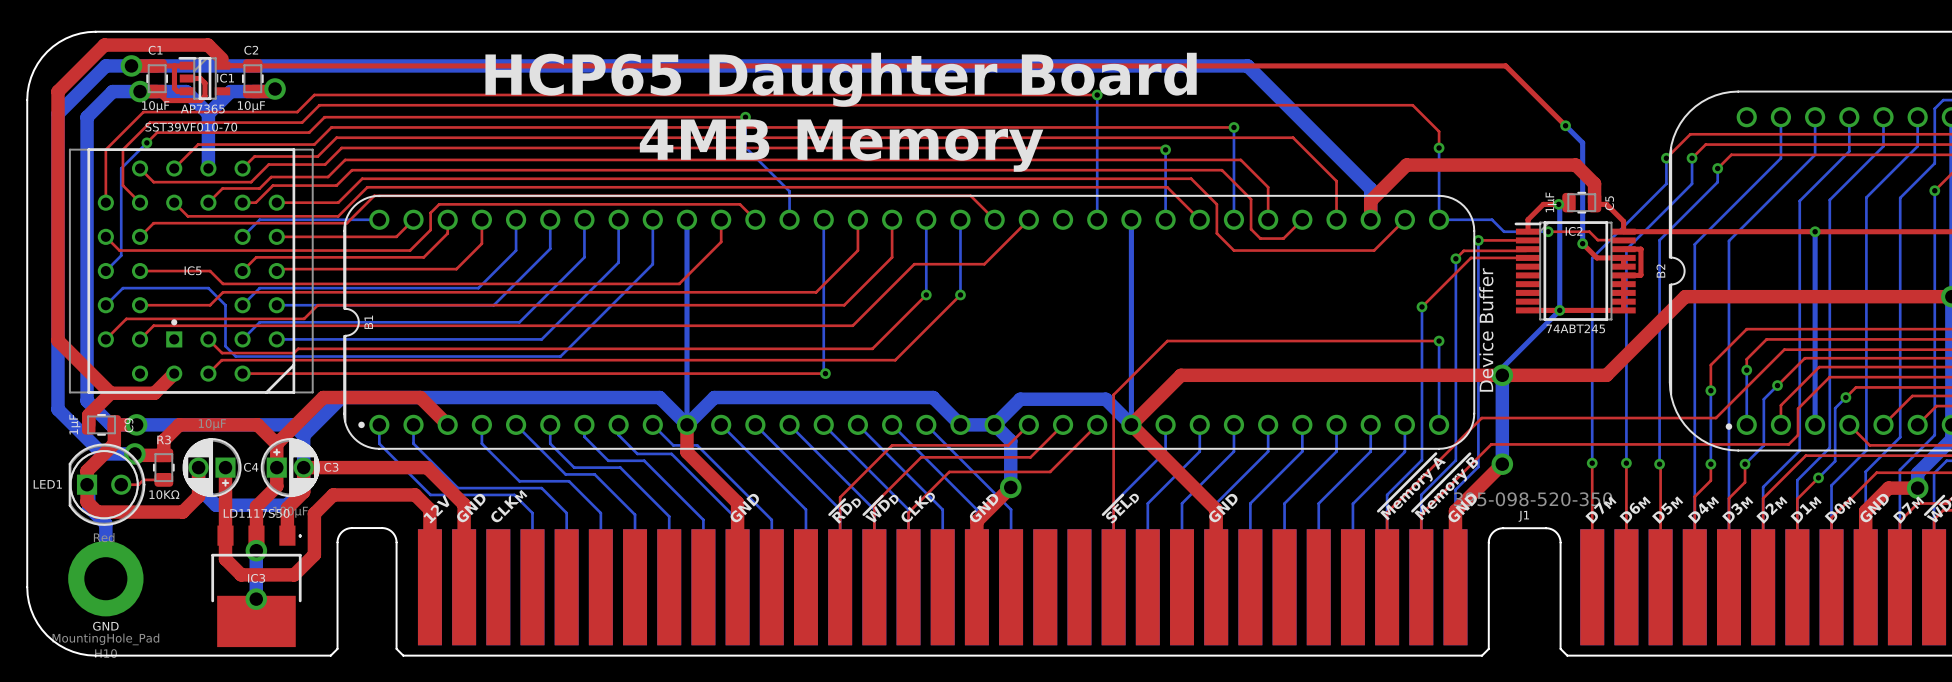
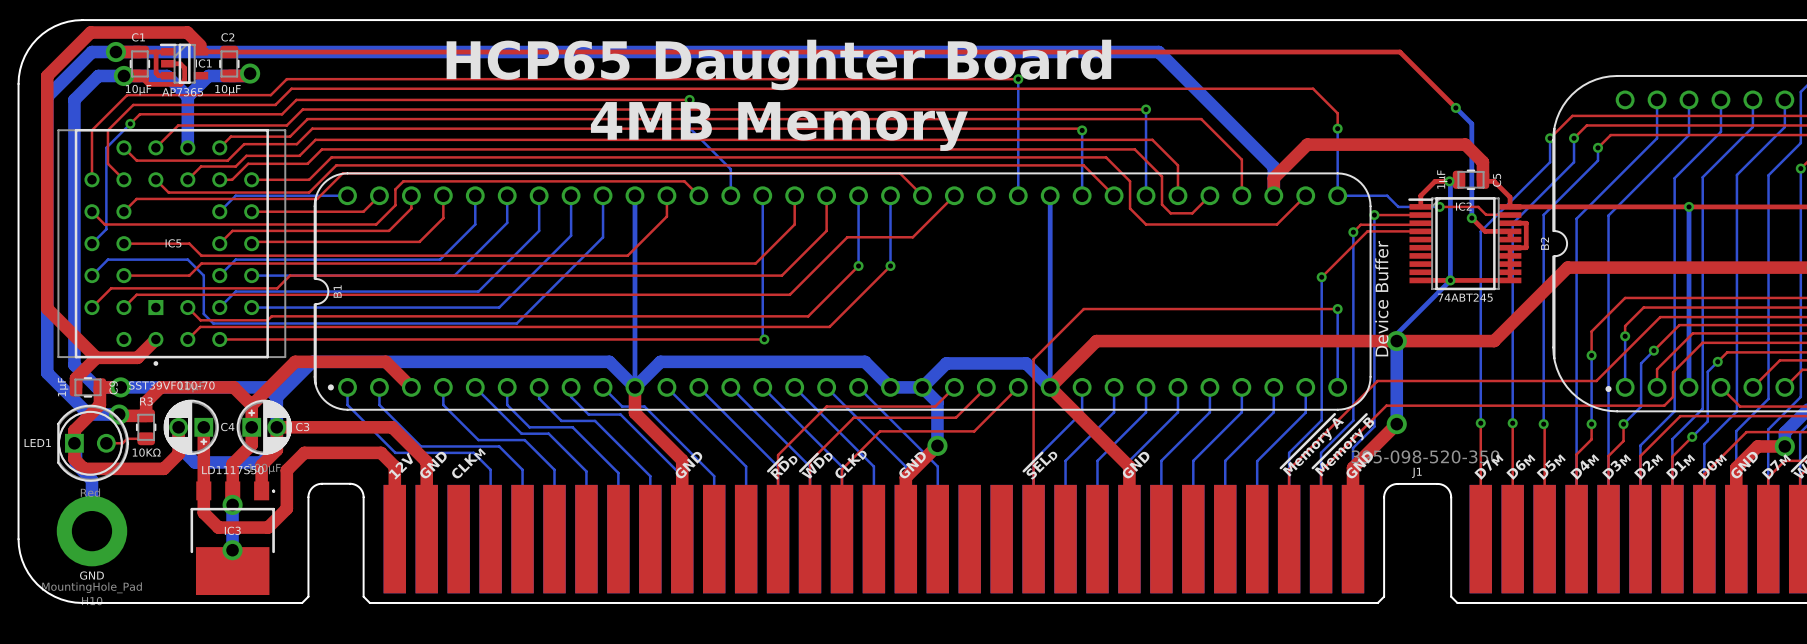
IC5 footprint: [69, 148, 314, 394] -> [57, 128, 286, 366]

